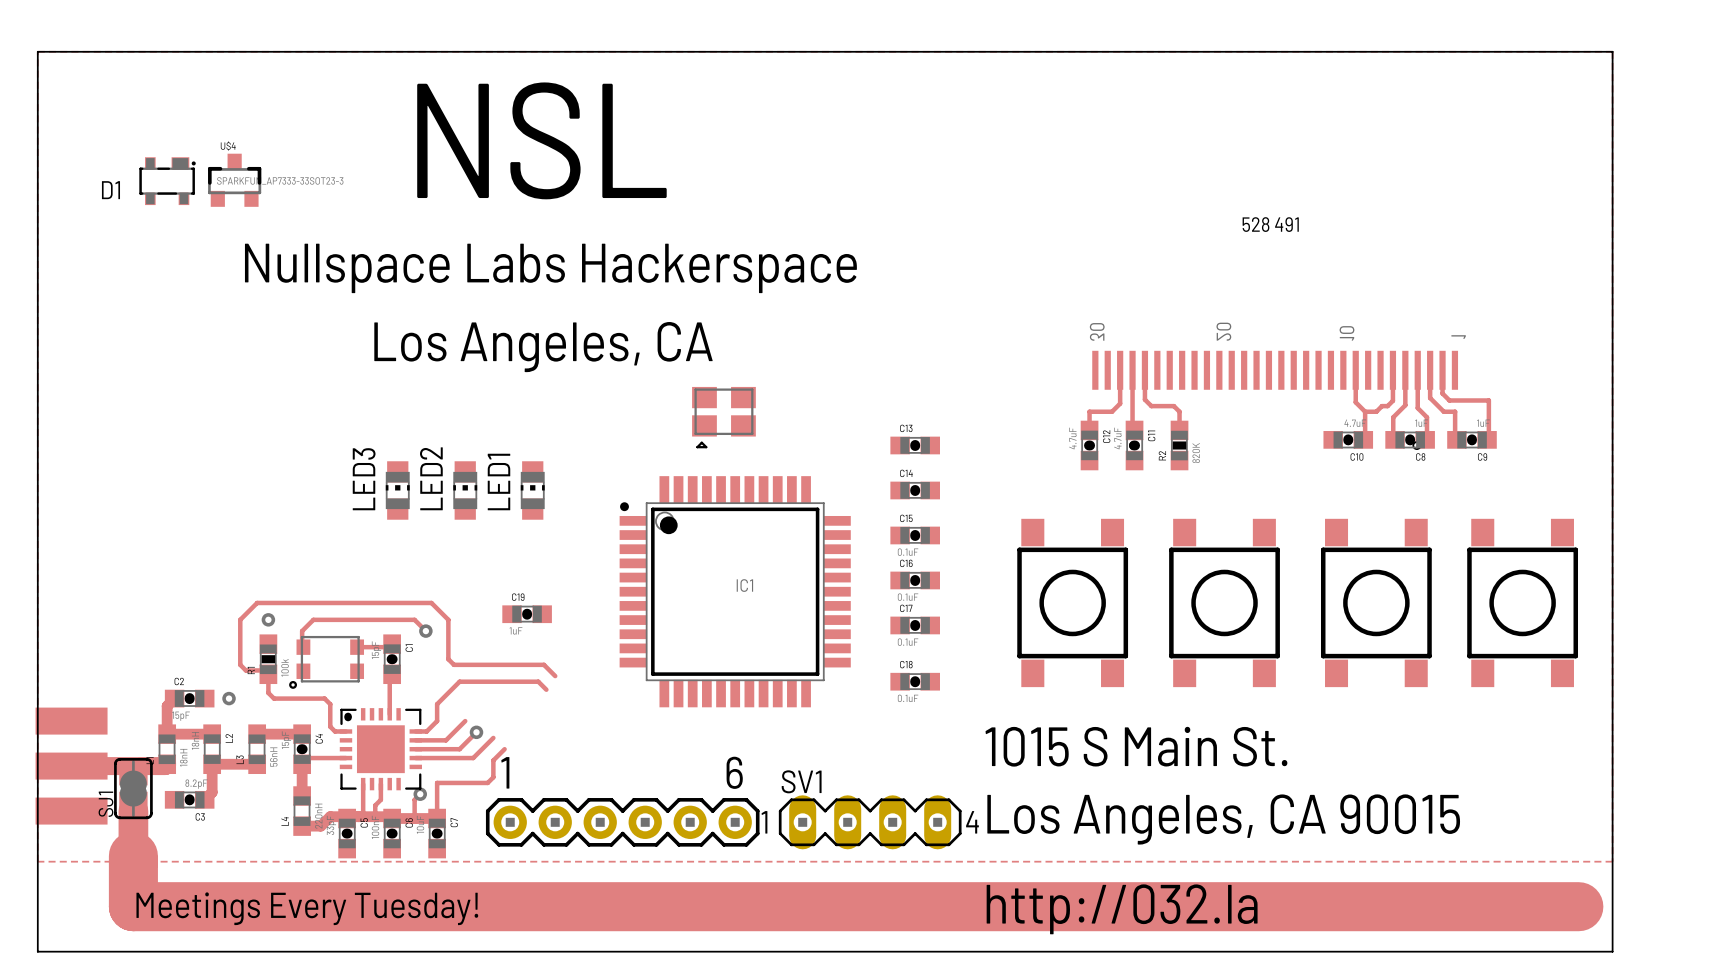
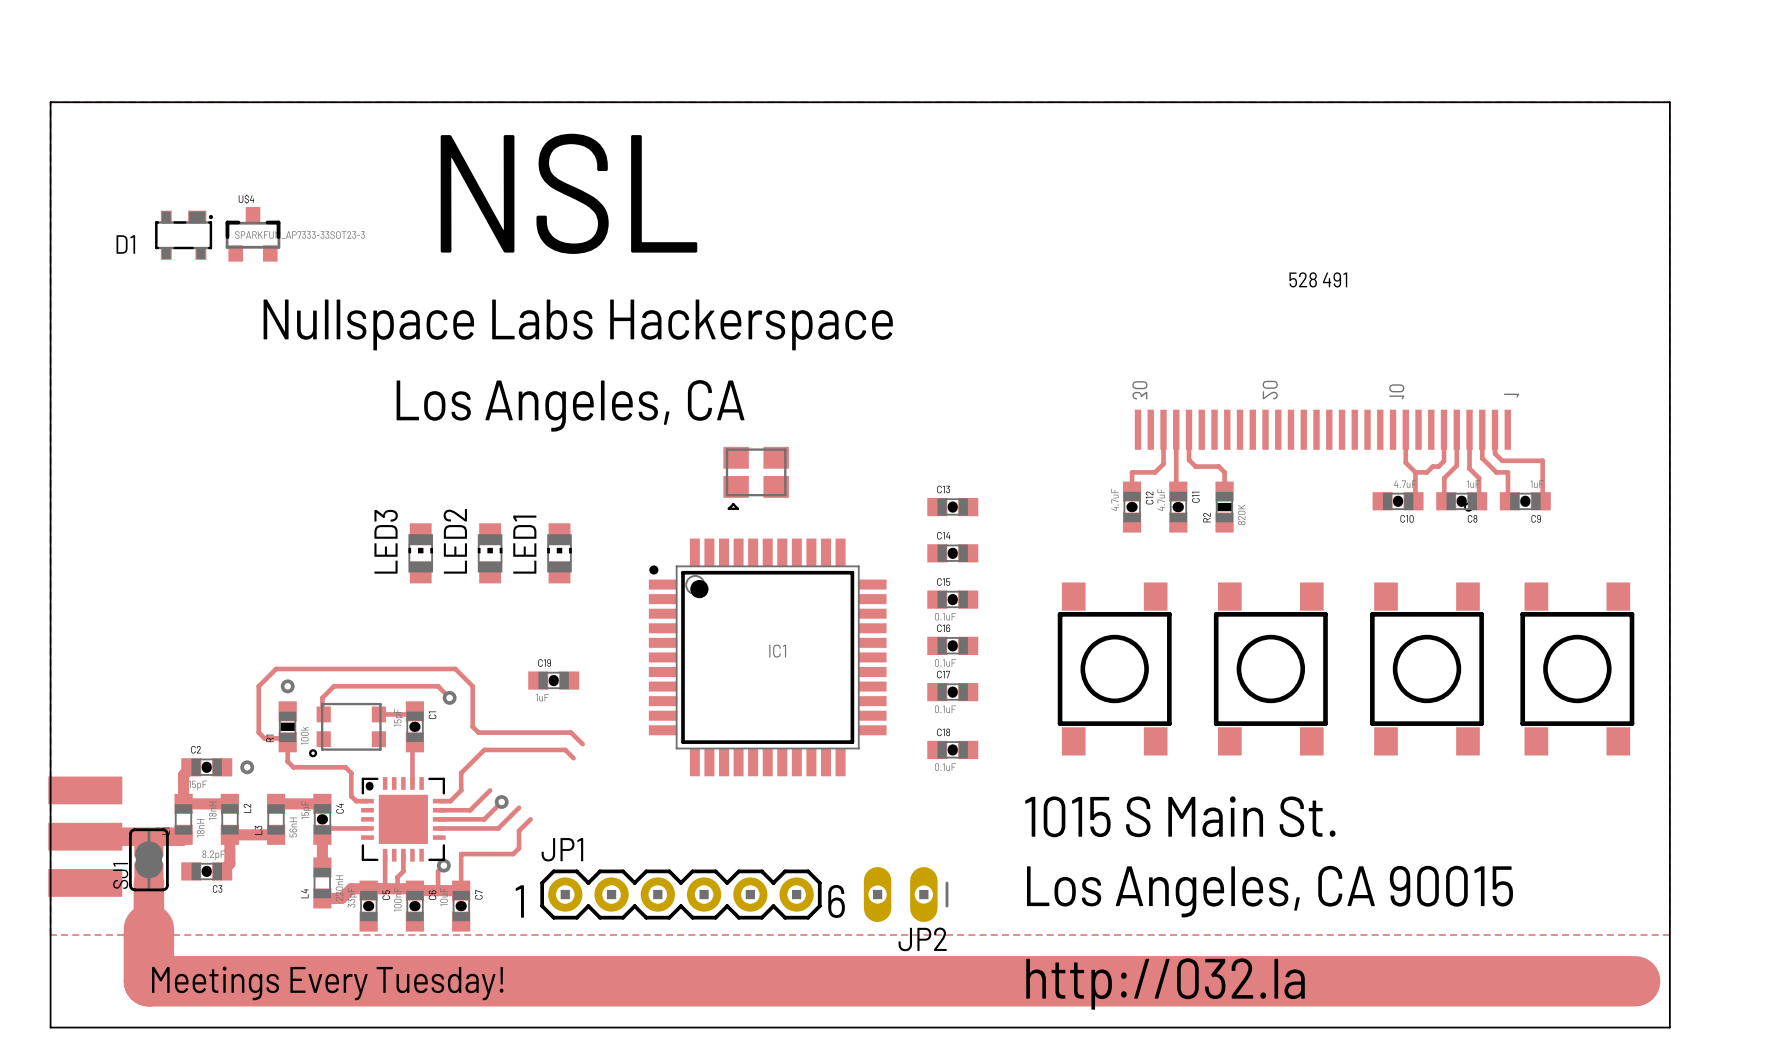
text position: 1 (505, 772) -> 1 (519, 901)
text position: 6 (734, 772) -> 6 (836, 901)
part: (622, 822) -> none
JP1: none -> (680, 894)
JP2: none -> (906, 894)
SV1: (870, 822) -> none

